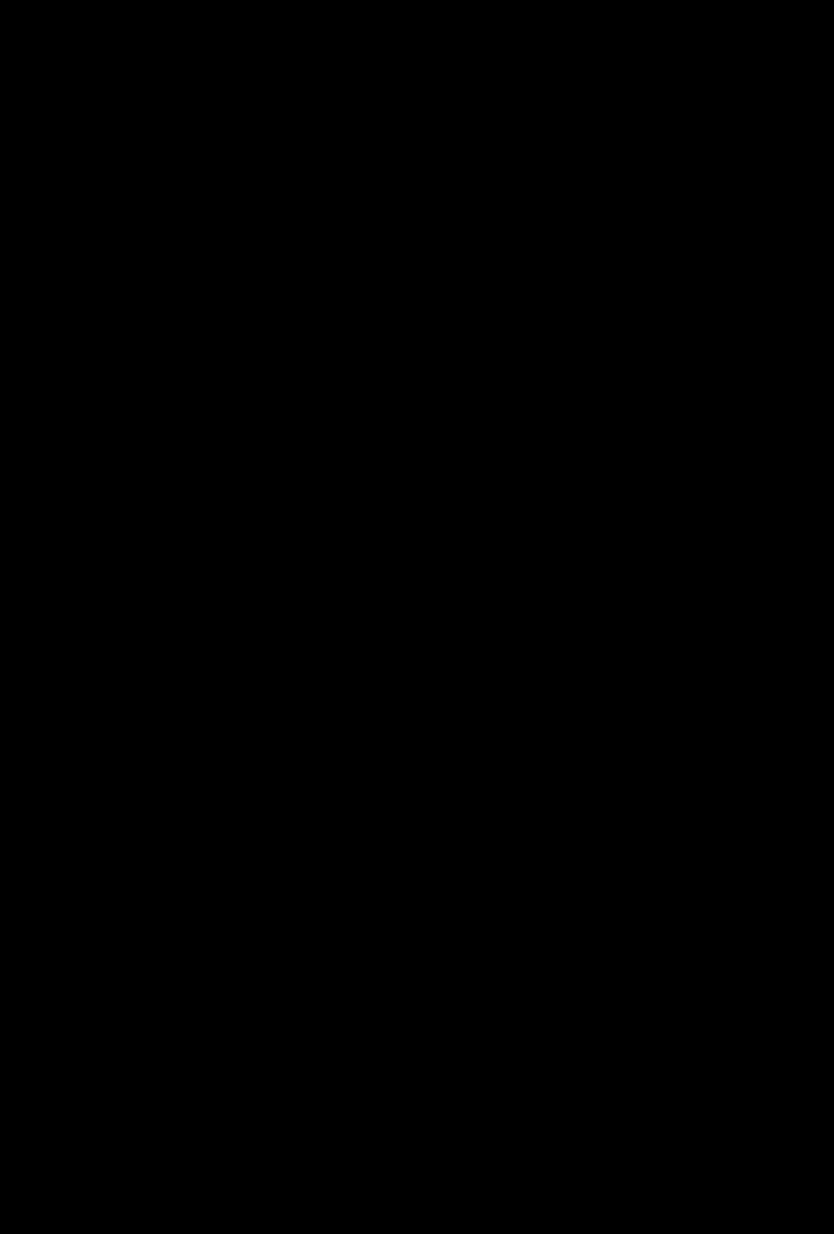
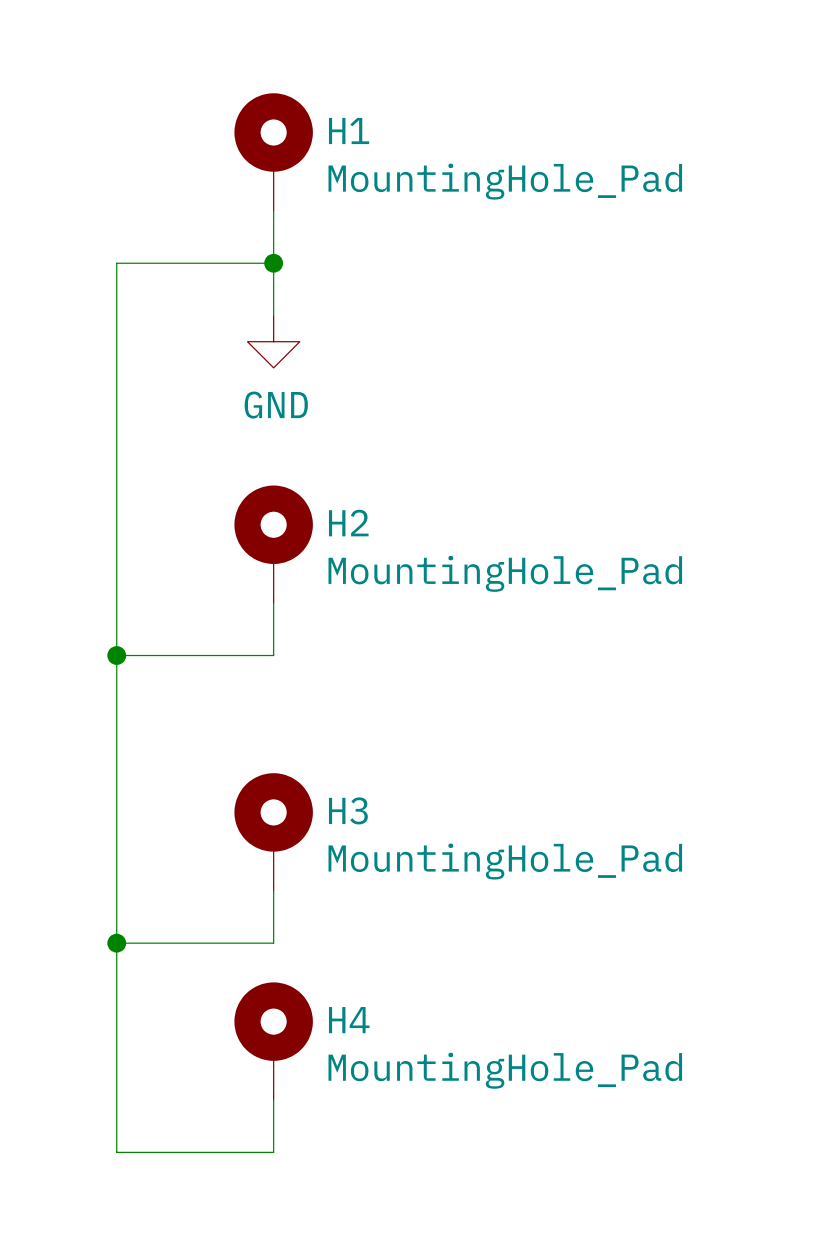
H1: none -> MountingHole_Pad (273, 152)
wire: none -> (273, 210) (273, 315)
wire: none -> (273, 263) (116, 263) (116, 1152) (273, 1152) (273, 1100)
junction: none -> (273, 263)
power symbol: none -> GND (273, 341)
H2: none -> MountingHole_Pad (273, 544)
wire: none -> (273, 603) (273, 655) (116, 655)
junction: none -> (116, 655)
H3: none -> MountingHole_Pad (273, 832)
wire: none -> (273, 890) (273, 943) (116, 943)
junction: none -> (116, 943)
H4: none -> MountingHole_Pad (273, 1041)

